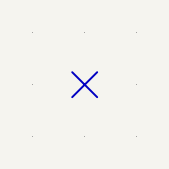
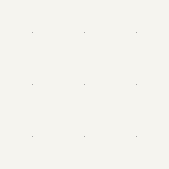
no-connect mark: (84, 84) -> none

